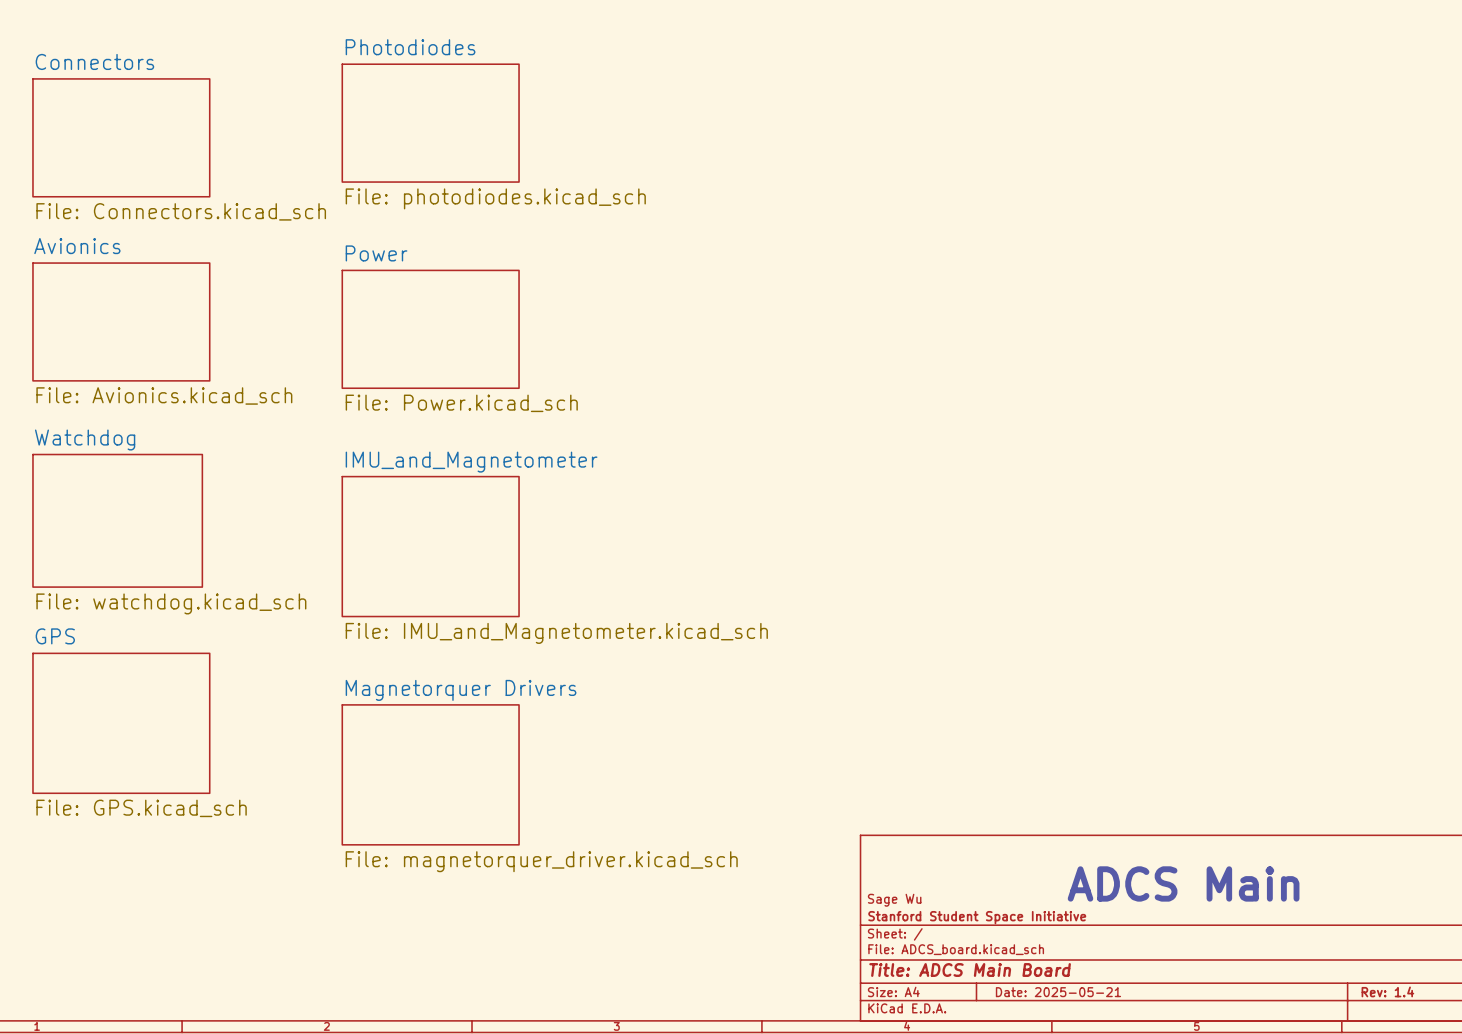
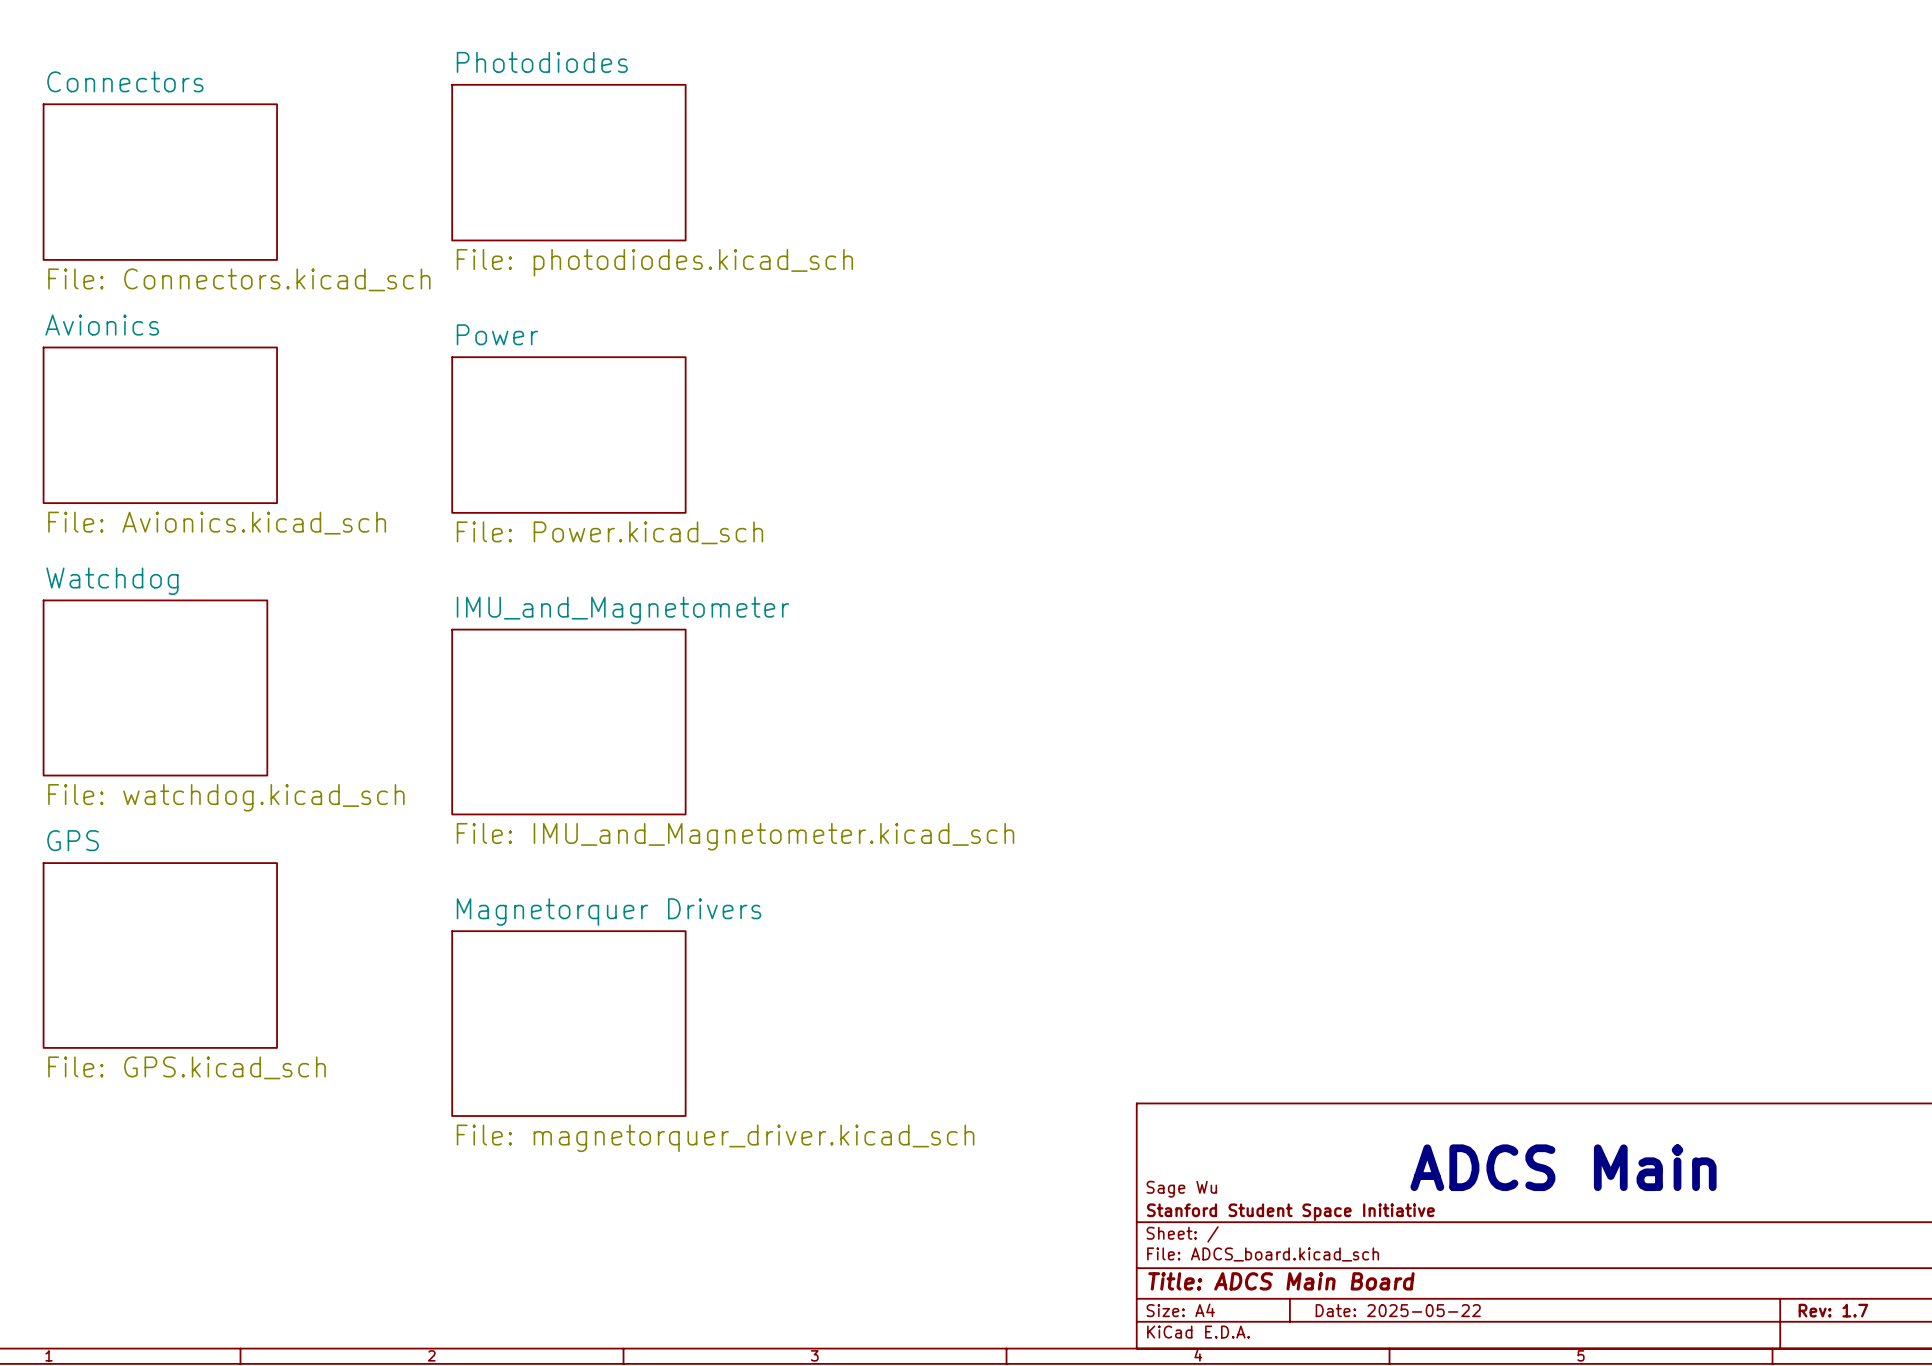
title block: Rev: 1.4 (1387, 991) -> Rev: 1.7 (1833, 1310)
title block: Date: 2025-05-21 (1058, 992) -> Date: 2025-05-22 (1398, 1310)

